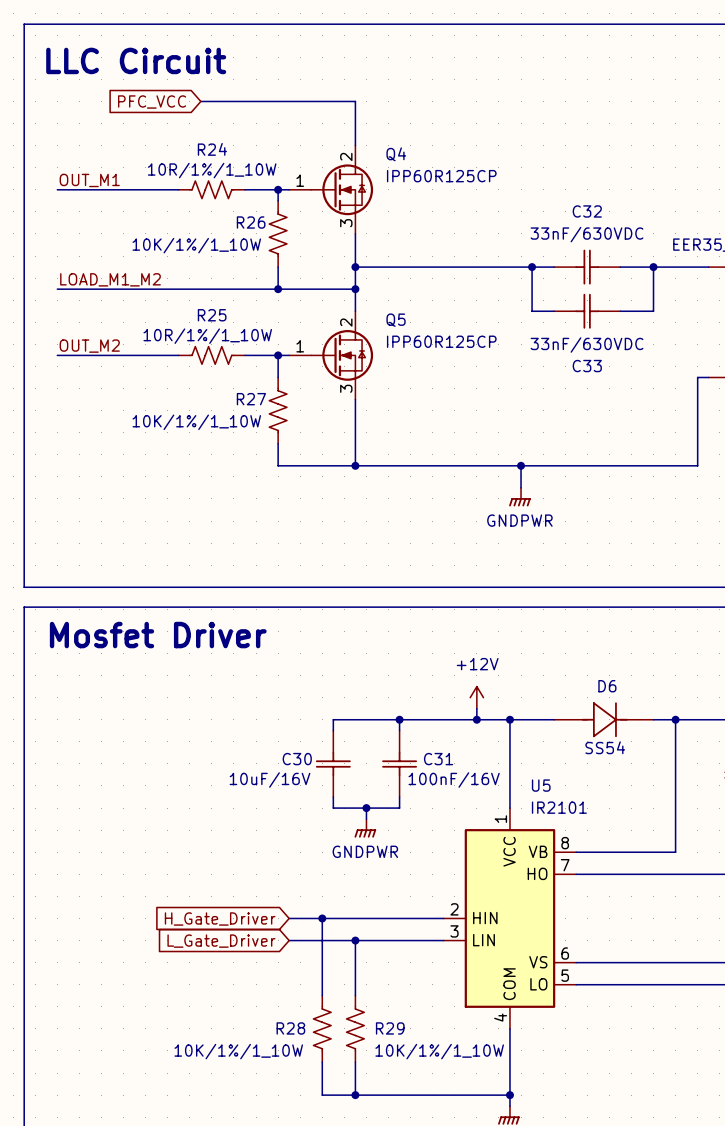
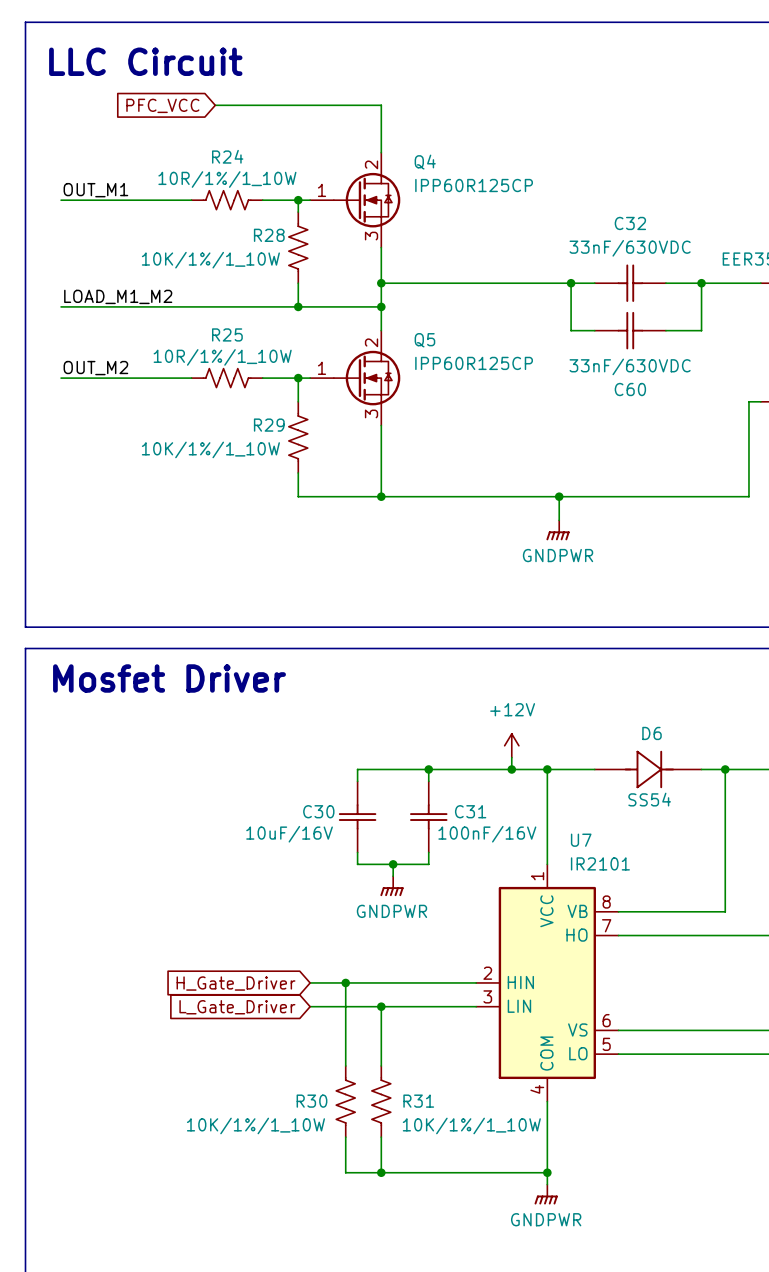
R26 name: R26 (251, 222) -> R28 (269, 235)
C33 name: C33 (587, 366) -> C60 (630, 389)
R27 name: R27 (251, 399) -> R29 (269, 425)
U5 name: U5 (541, 785) -> U7 (581, 840)
R28 name: R28 (290, 1028) -> R30 (311, 1101)
R29 name: R29 (390, 1028) -> R31 (418, 1101)

